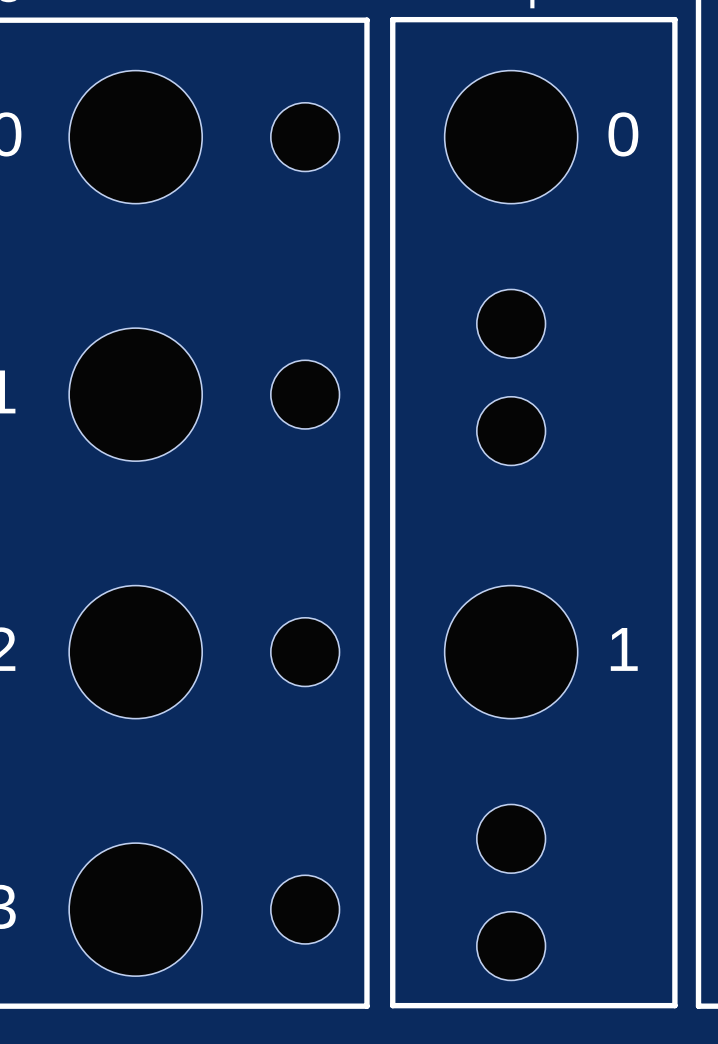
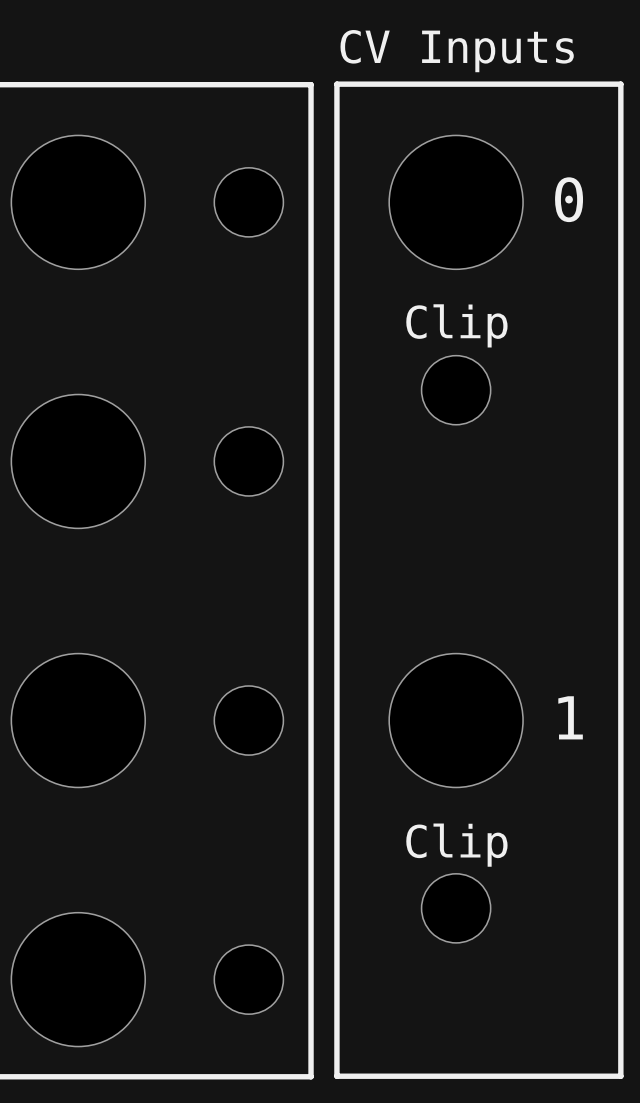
text: none -> Clip (456, 325)
part: (511, 431) -> none
text: none -> Clip (456, 845)
part: (511, 946) -> none

